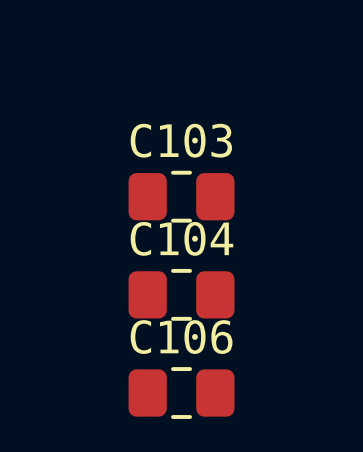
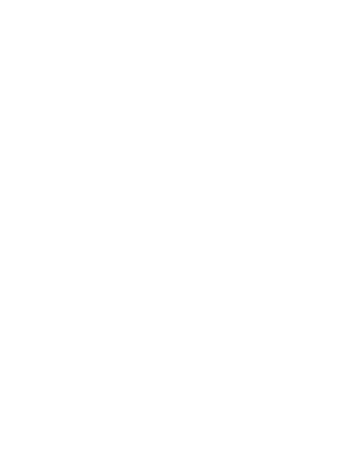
C103: (181, 196) -> none
C104: (181, 294) -> none
C106: (181, 393) -> none

